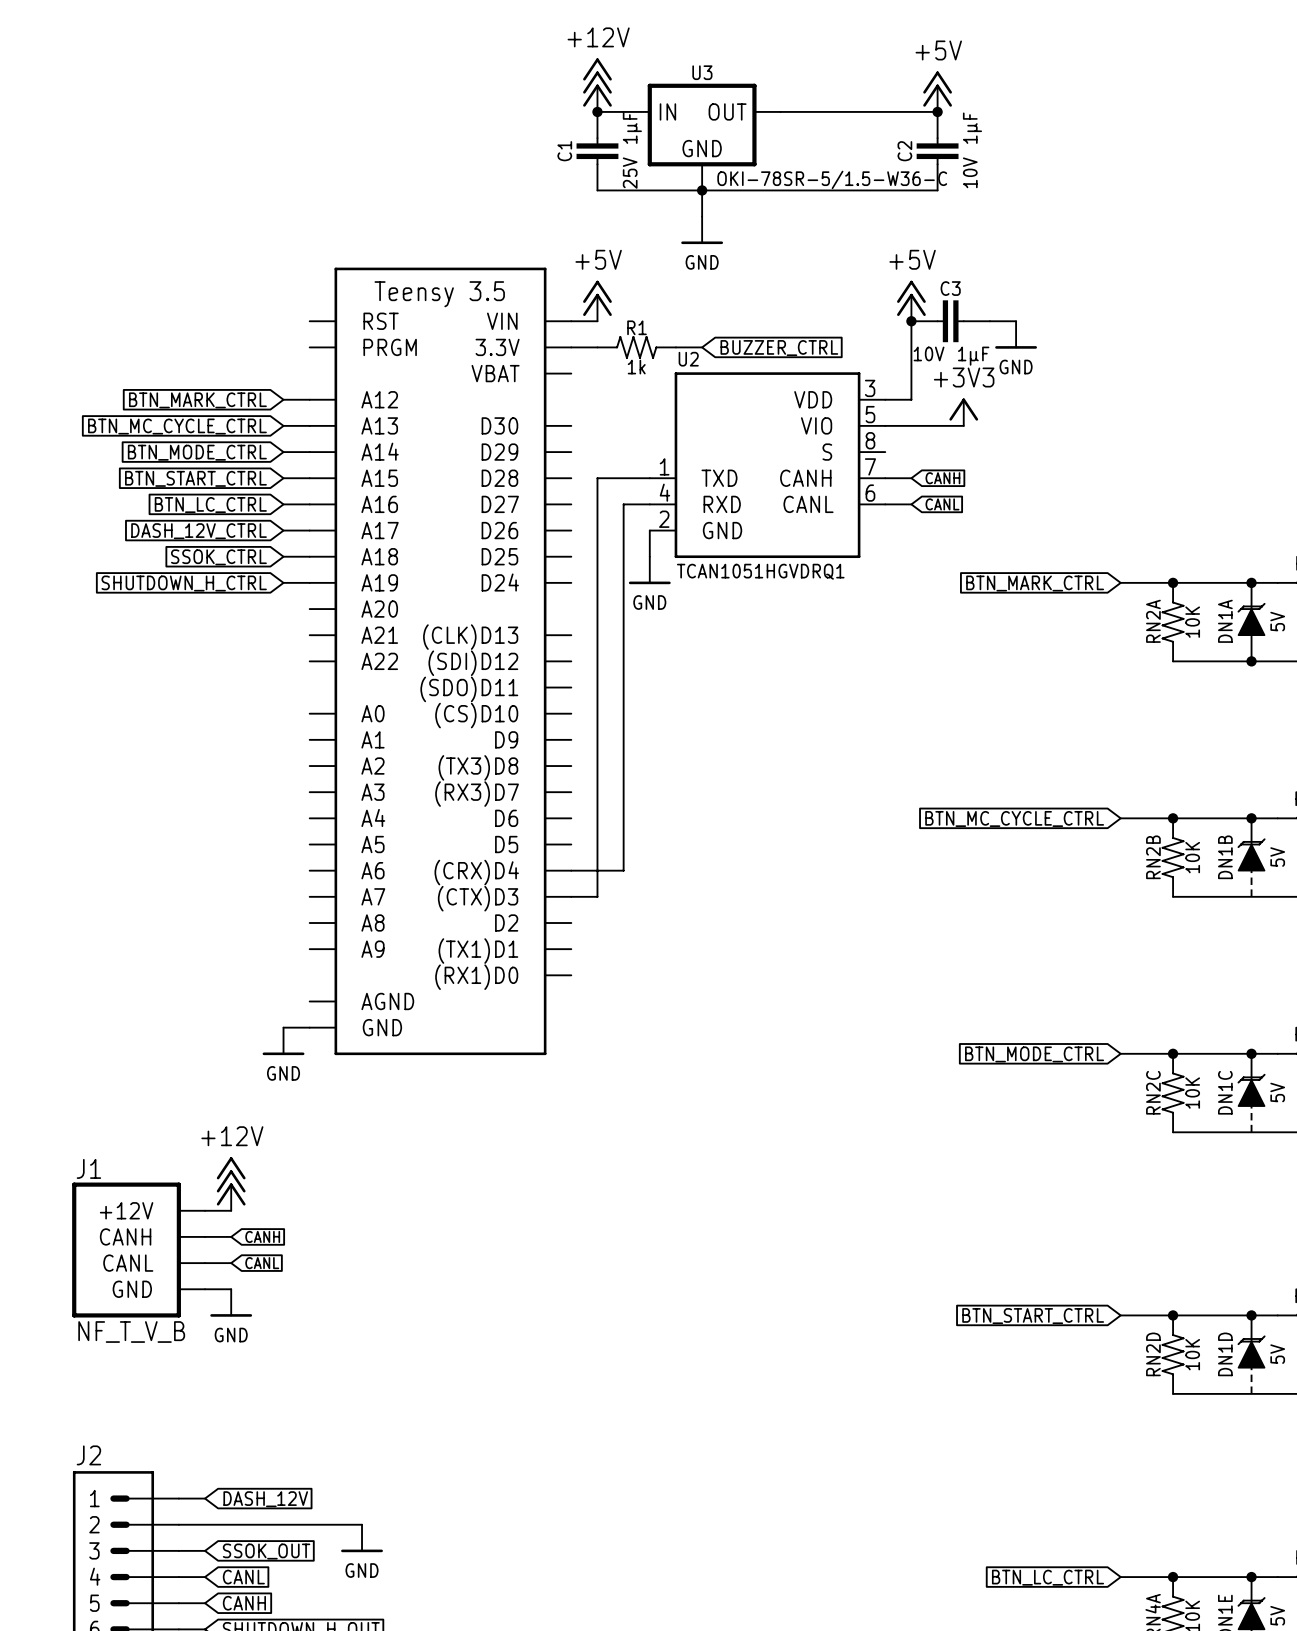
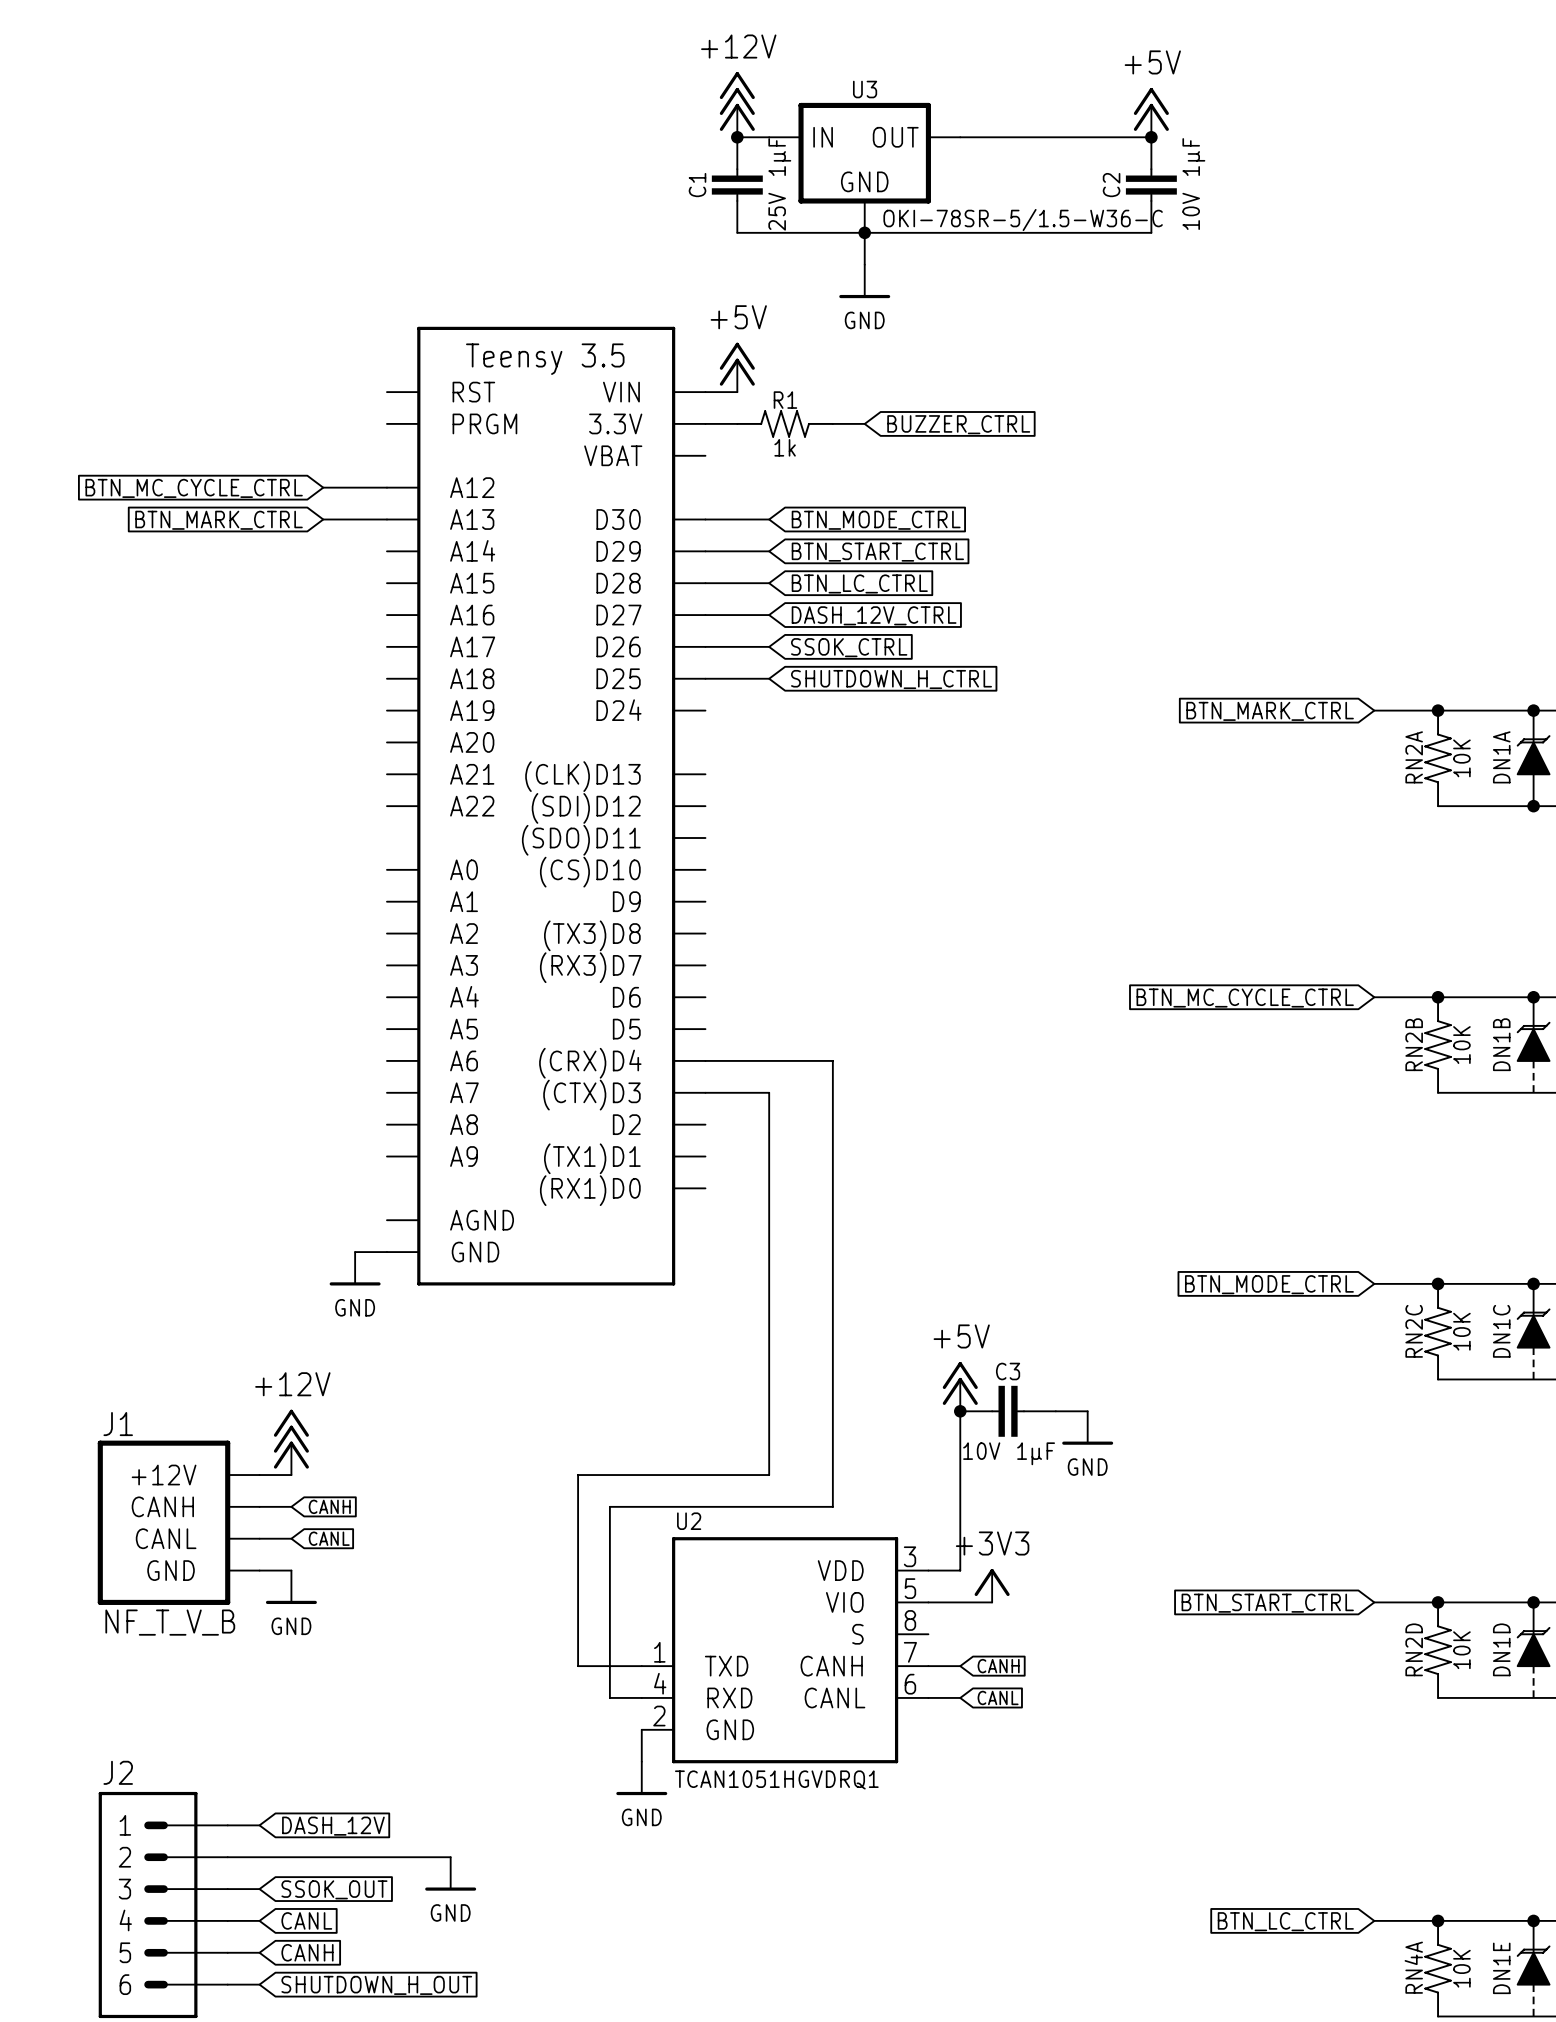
power symbol: +5V (911, 300) -> none
wire: (911, 321) (911, 399) (885, 399) -> none
junction: (911, 321) -> none
C3 position: (950, 321) -> (1008, 1411)
wire: (989, 321) (1016, 321) -> none
power symbol: GND (1016, 334) -> none
global label position: BTN_MARK_CTRL (197, 400) -> BTN_MARK_CTRL (219, 520)
power symbol: +3V3 (963, 412) -> none
wire: none -> (705, 519) (769, 519)
wire: (885, 425) (963, 425) -> none
global label position: BTN_MC_CYCLE_CTRL (177, 426) -> BTN_MC_CYCLE_CTRL (194, 488)
global label: none -> BTN_MODE_CTRL (876, 520)
global label: BTN_MODE_CTRL (197, 452) -> none
wire: (283, 452) (309, 452) -> (323, 487) (355, 487)
wire: none -> (705, 551) (769, 551)
global label: none -> BTN_START_CTRL (877, 552)
U2 position: (767, 465) -> (785, 1650)
global label: BTN_START_CTRL (195, 478) -> none
wire: (283, 478) (309, 478) -> (323, 519) (355, 519)
wire: (597, 478) (597, 896) -> (737, 583) (705, 583)
wire: (623, 478) (649, 478) -> none
global label: none -> BTN_LC_CTRL (859, 583)
wire: (885, 478) (911, 478) -> none
global label: CANH (942, 478) -> none
wire: (283, 504) (309, 504) -> none
wire: none -> (705, 615) (769, 615)
wire: (649, 504) (623, 504) (623, 870) -> (641, 1697) (609, 1697) (609, 1506) (832, 1506) (832, 1060) (769, 1060)
wire: (885, 504) (911, 504) -> none
global label: CANL (942, 504) -> none
global label: BTN_LC_CTRL (210, 505) -> none
global label: none -> DASH_12V_CTRL (874, 615)
wire: (283, 530) (309, 530) -> none
wire: none -> (705, 646) (769, 646)
wire: (649, 530) (649, 556) -> none
global label: DASH_12V_CTRL (199, 531) -> none
global label: none -> SSOK_CTRL (849, 647)
wire: (283, 556) (309, 556) -> none
wire: none -> (705, 678) (769, 678)
global label: SSOK_CTRL (218, 557) -> none
global label: none -> SHUTDOWN_H_CTRL (891, 679)
power symbol: GND (649, 570) -> none
wire: (283, 582) (309, 582) -> none
global label: SHUTDOWN_H_CTRL (184, 583) -> none
wire: none -> (737, 1092) (769, 1092) (769, 1475) (578, 1475) (578, 1666) (641, 1666)
power symbol: none -> +5V (960, 1386)
wire: none -> (960, 1411) (960, 1570) (928, 1570)
junction: none -> (960, 1411)
wire: none -> (1055, 1411) (1087, 1411)
power symbol: none -> GND (1087, 1428)
power symbol: none -> +3V3 (992, 1585)
wire: none -> (928, 1602) (992, 1602)
wire: none -> (928, 1666) (960, 1666)
global label: none -> CANH (998, 1666)
wire: none -> (928, 1697) (960, 1697)
global label: none -> CANL (998, 1697)
wire: none -> (641, 1729) (641, 1761)
power symbol: none -> GND (641, 1778)

